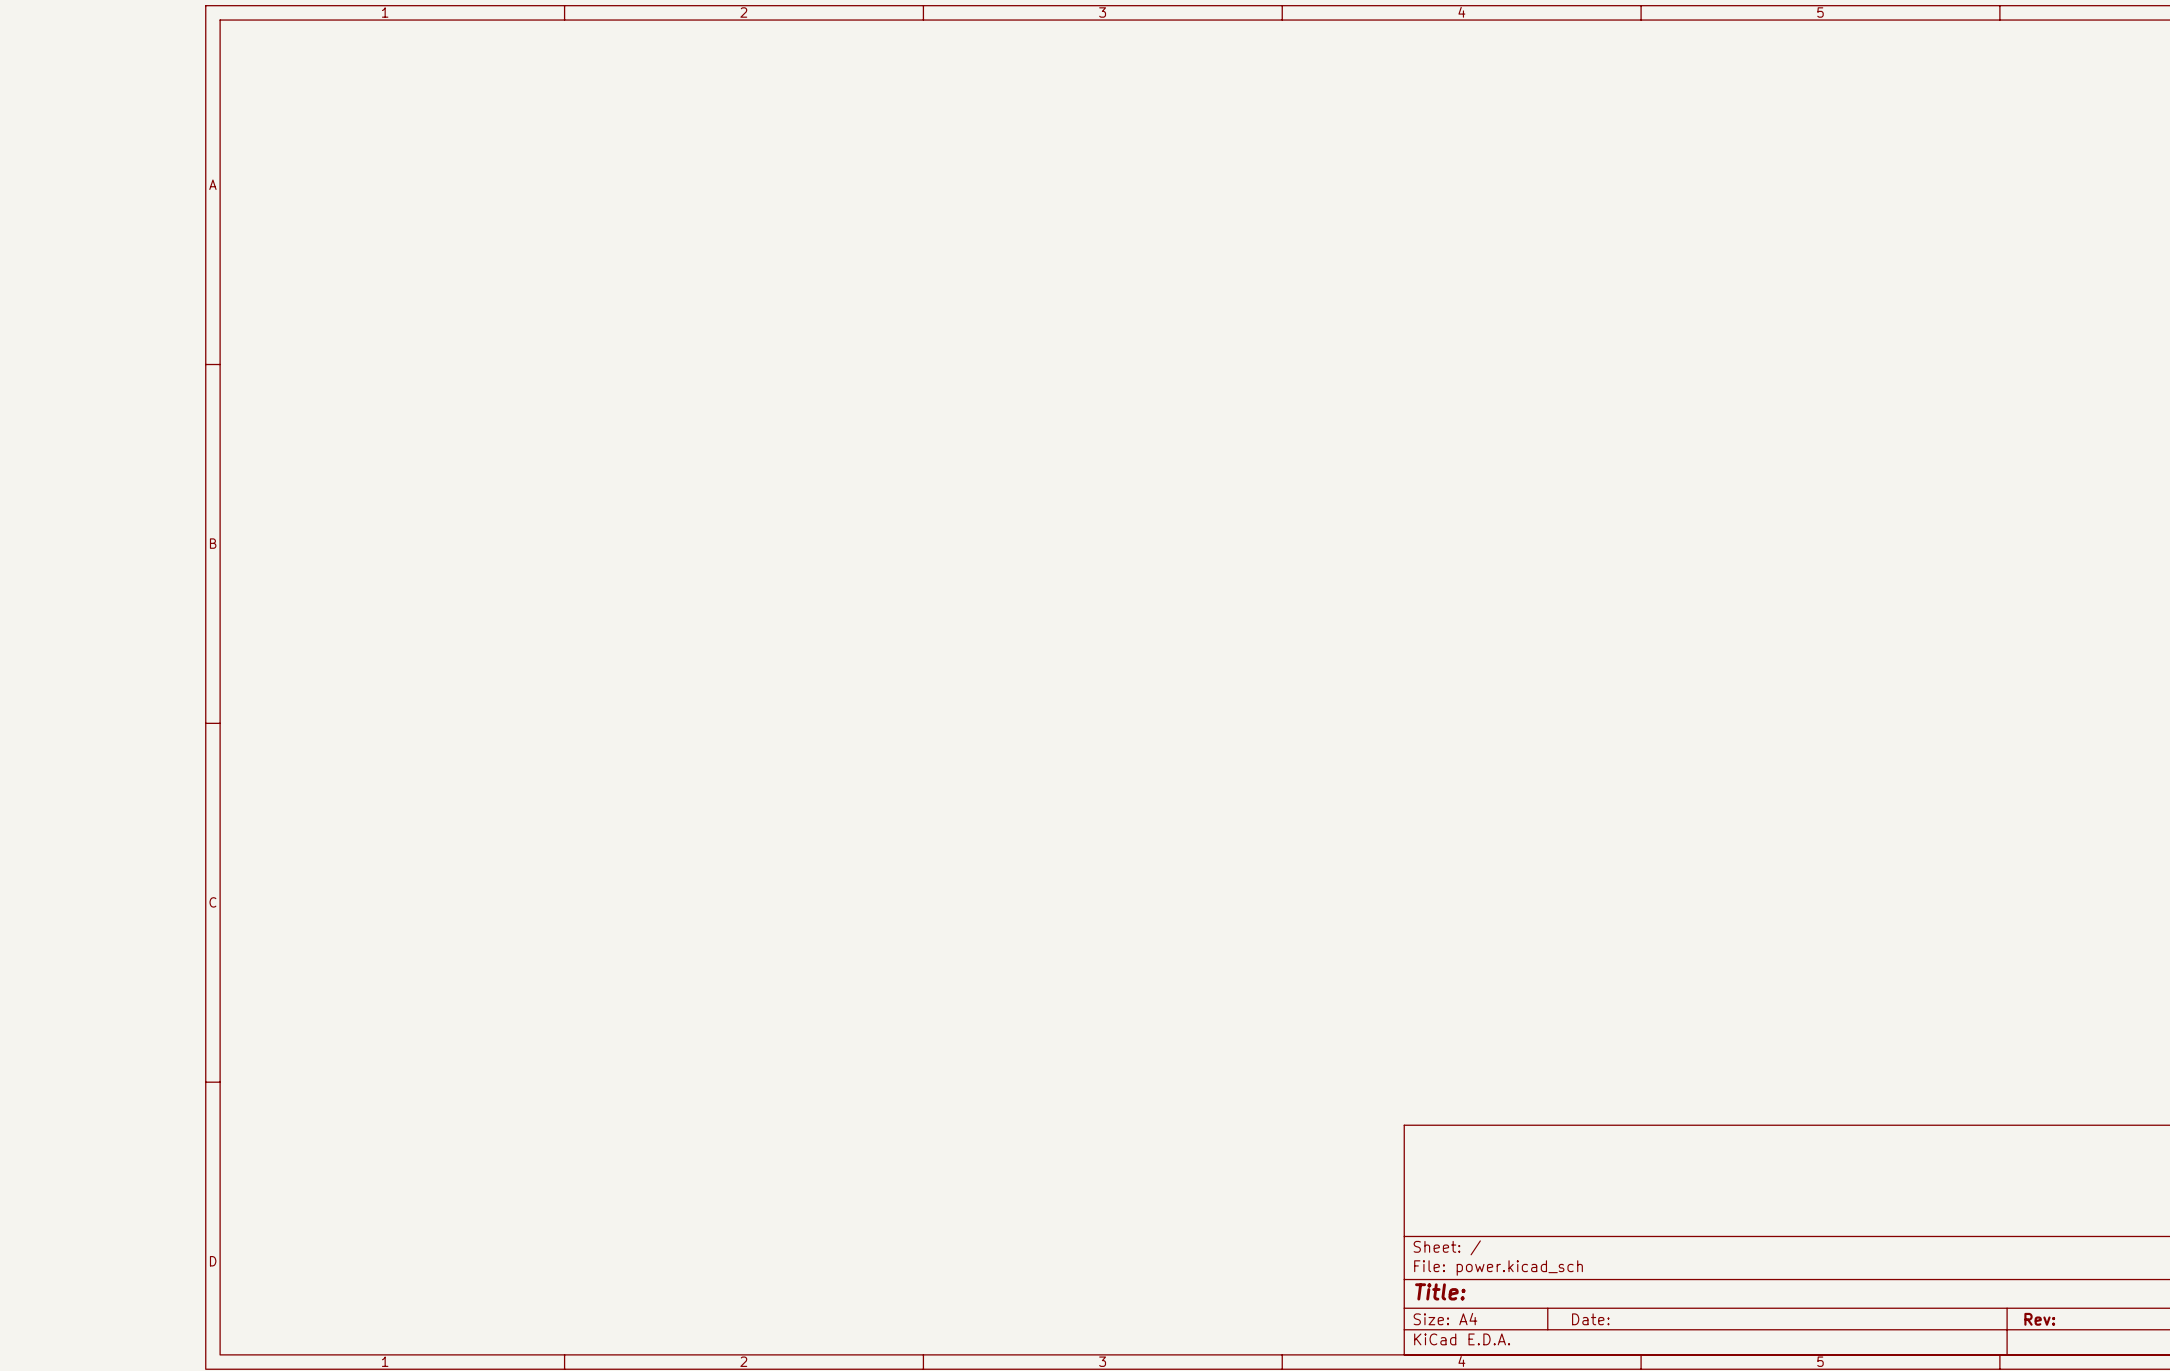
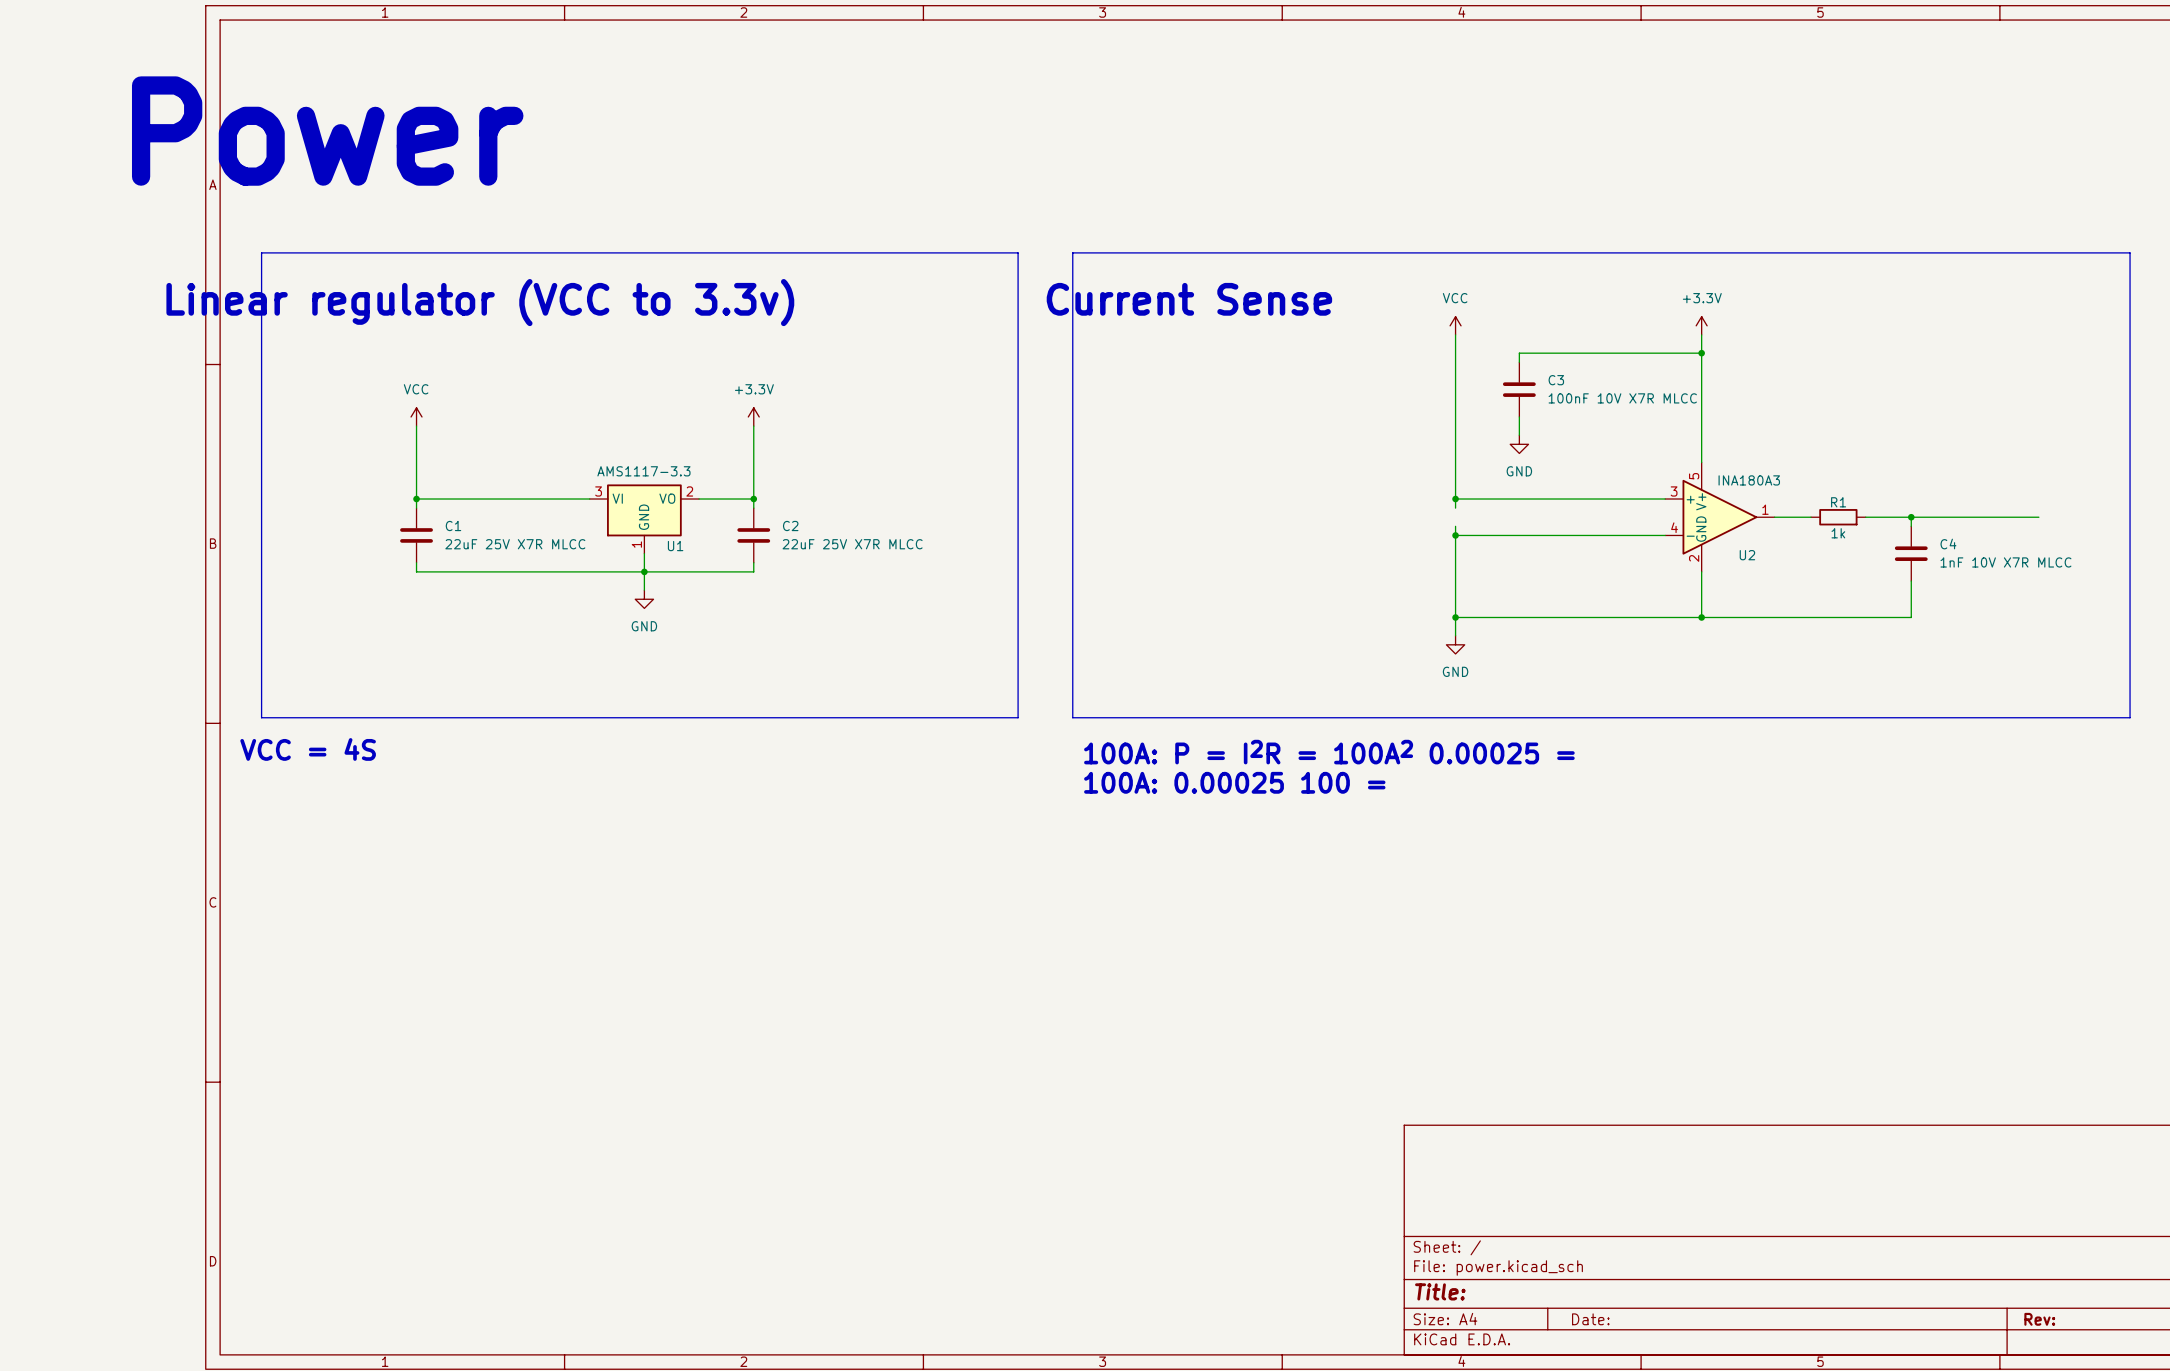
text: none -> Power (327, 131)
line: none -> (261, 252) (1018, 252) (1018, 717) (261, 717) (261, 252)
line: none -> (1072, 252) (2130, 252) (2130, 717) (1072, 717) (1072, 252)
text: none -> Current Sense (1189, 299)
text: none -> Linear regulator (VCC to 3.3v) (480, 302)
power symbol: none -> VCC (1455, 325)
power symbol: none -> +3.3V (1701, 325)
wire: none -> (1455, 334) (1455, 508)
wire: none -> (1701, 334) (1701, 462)
wire: none -> (1701, 353) (1519, 353) (1519, 362)
junction: none -> (1701, 353)
C3: none -> 100nF 10V X7R MLCC (1519, 389)
power symbol: none -> VCC (416, 416)
power symbol: none -> +3.3V (753, 416)
wire: none -> (1519, 416) (1519, 435)
wire: none -> (416, 426) (416, 508)
wire: none -> (753, 426) (753, 508)
power symbol: none -> GND (1519, 444)
wire: none -> (416, 499) (589, 499)
junction: none -> (416, 499)
wire: none -> (699, 499) (753, 499)
junction: none -> (753, 499)
wire: none -> (1455, 499) (1665, 499)
junction: none -> (1455, 499)
U2: none -> INA180A3 (1719, 517)
wire: none -> (1774, 517) (1811, 517)
R1: none -> 1k (1838, 517)
wire: none -> (1865, 517) (2038, 517)
wire: none -> (1911, 517) (1911, 526)
junction: none -> (1911, 517)
U1: none -> AMS1117-3.3 (644, 519)
wire: none -> (1455, 526) (1455, 635)
C1: none -> 22uF 25V X7R MLCC (416, 535)
C2: none -> 22uF 25V X7R MLCC (753, 535)
wire: none -> (1455, 535) (1665, 535)
junction: none -> (1455, 535)
wire: none -> (644, 553) (644, 590)
C4: none -> 1nF 10V X7R MLCC (1911, 553)
wire: none -> (416, 562) (416, 571) (753, 571) (753, 562)
junction: none -> (644, 571)
wire: none -> (1701, 571) (1701, 617)
wire: none -> (1911, 581) (1911, 617) (1455, 617)
power symbol: none -> GND (644, 599)
junction: none -> (1455, 617)
junction: none -> (1701, 617)
power symbol: none -> GND (1455, 644)
text: none -> VCC = 4S (308, 749)
text: none -> 100A: P = I2R = 100A2 0.00025 = (1329, 752)
text: none -> 100A: 0.00025 100 = (1234, 782)

